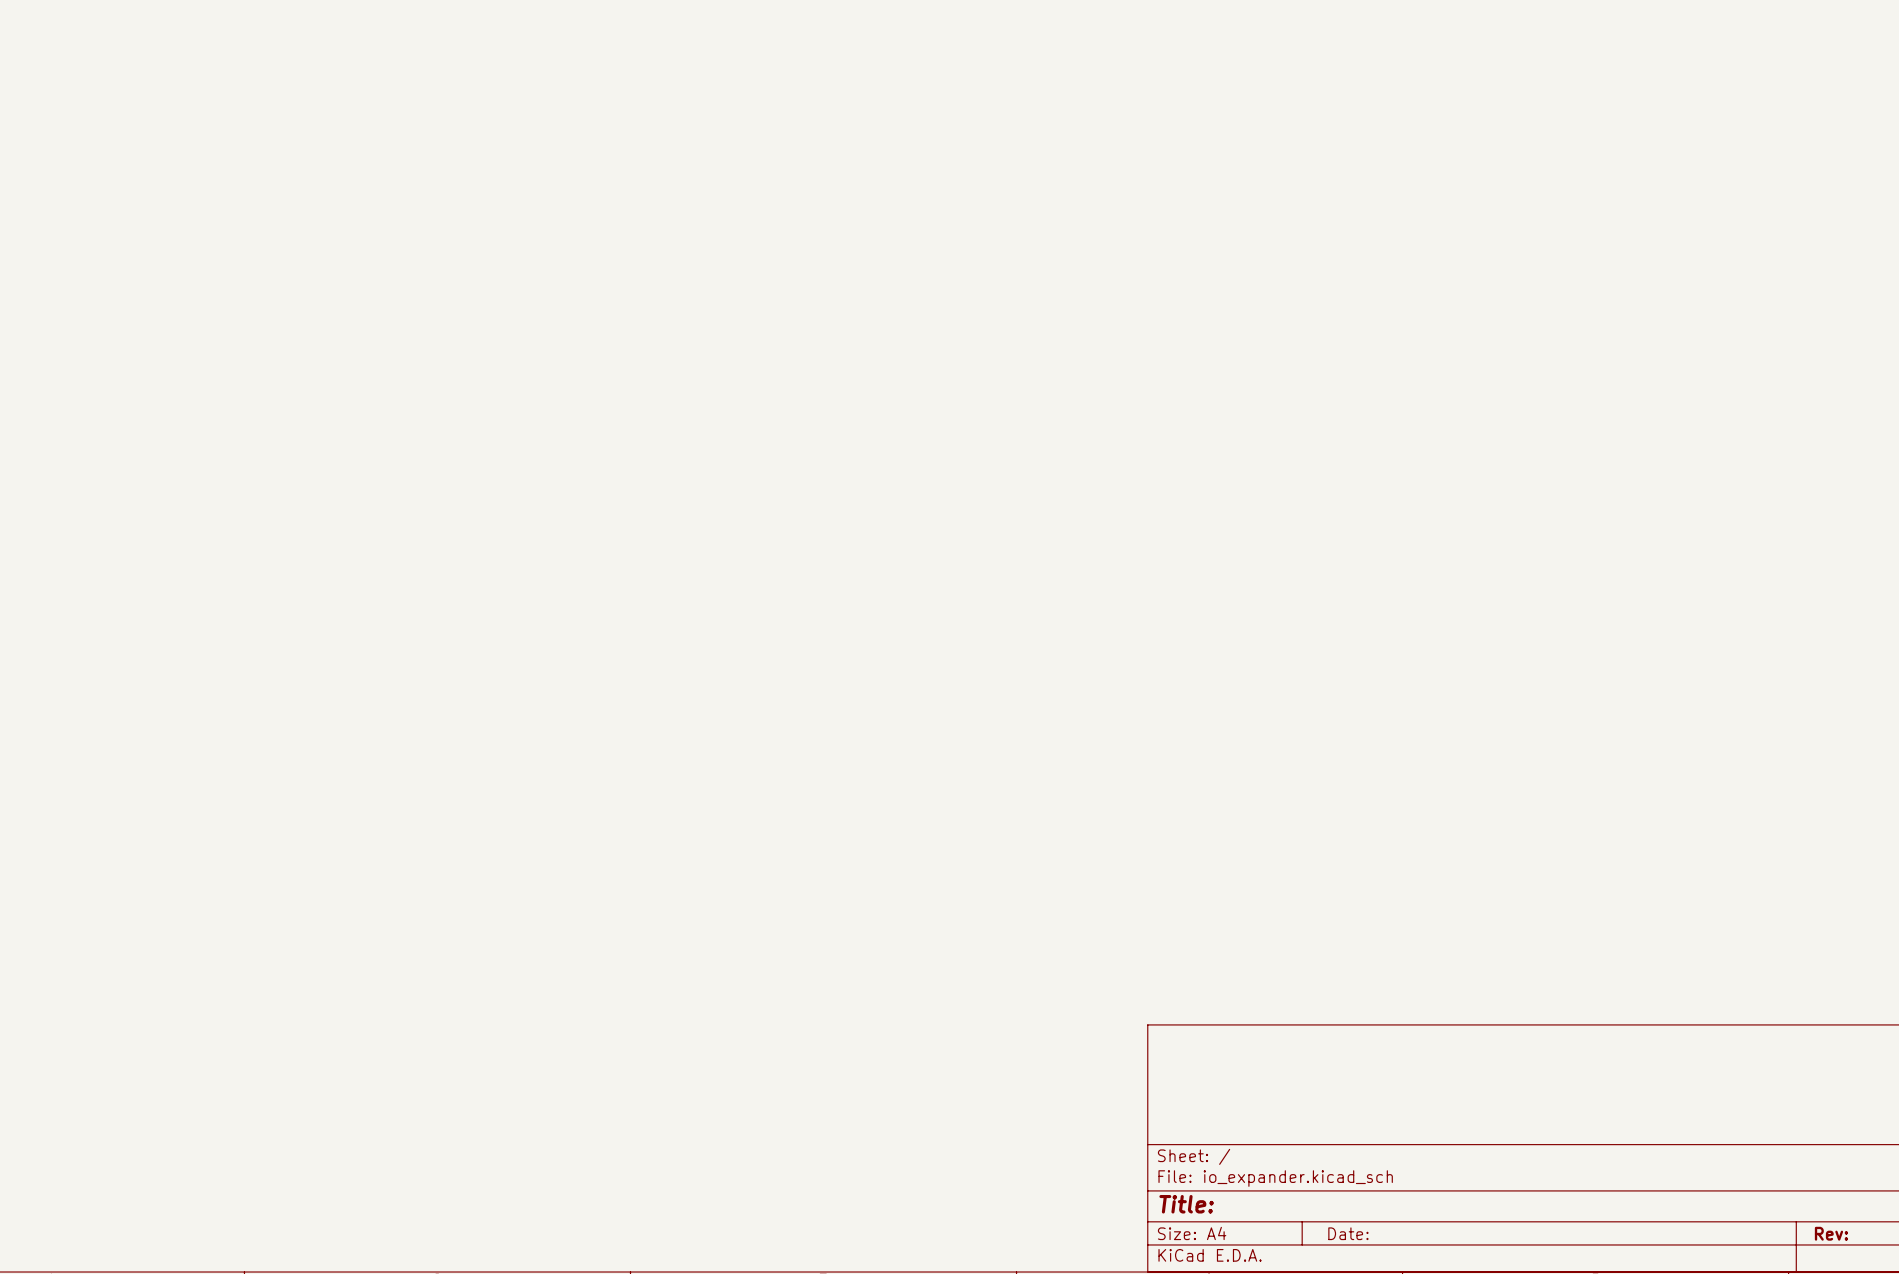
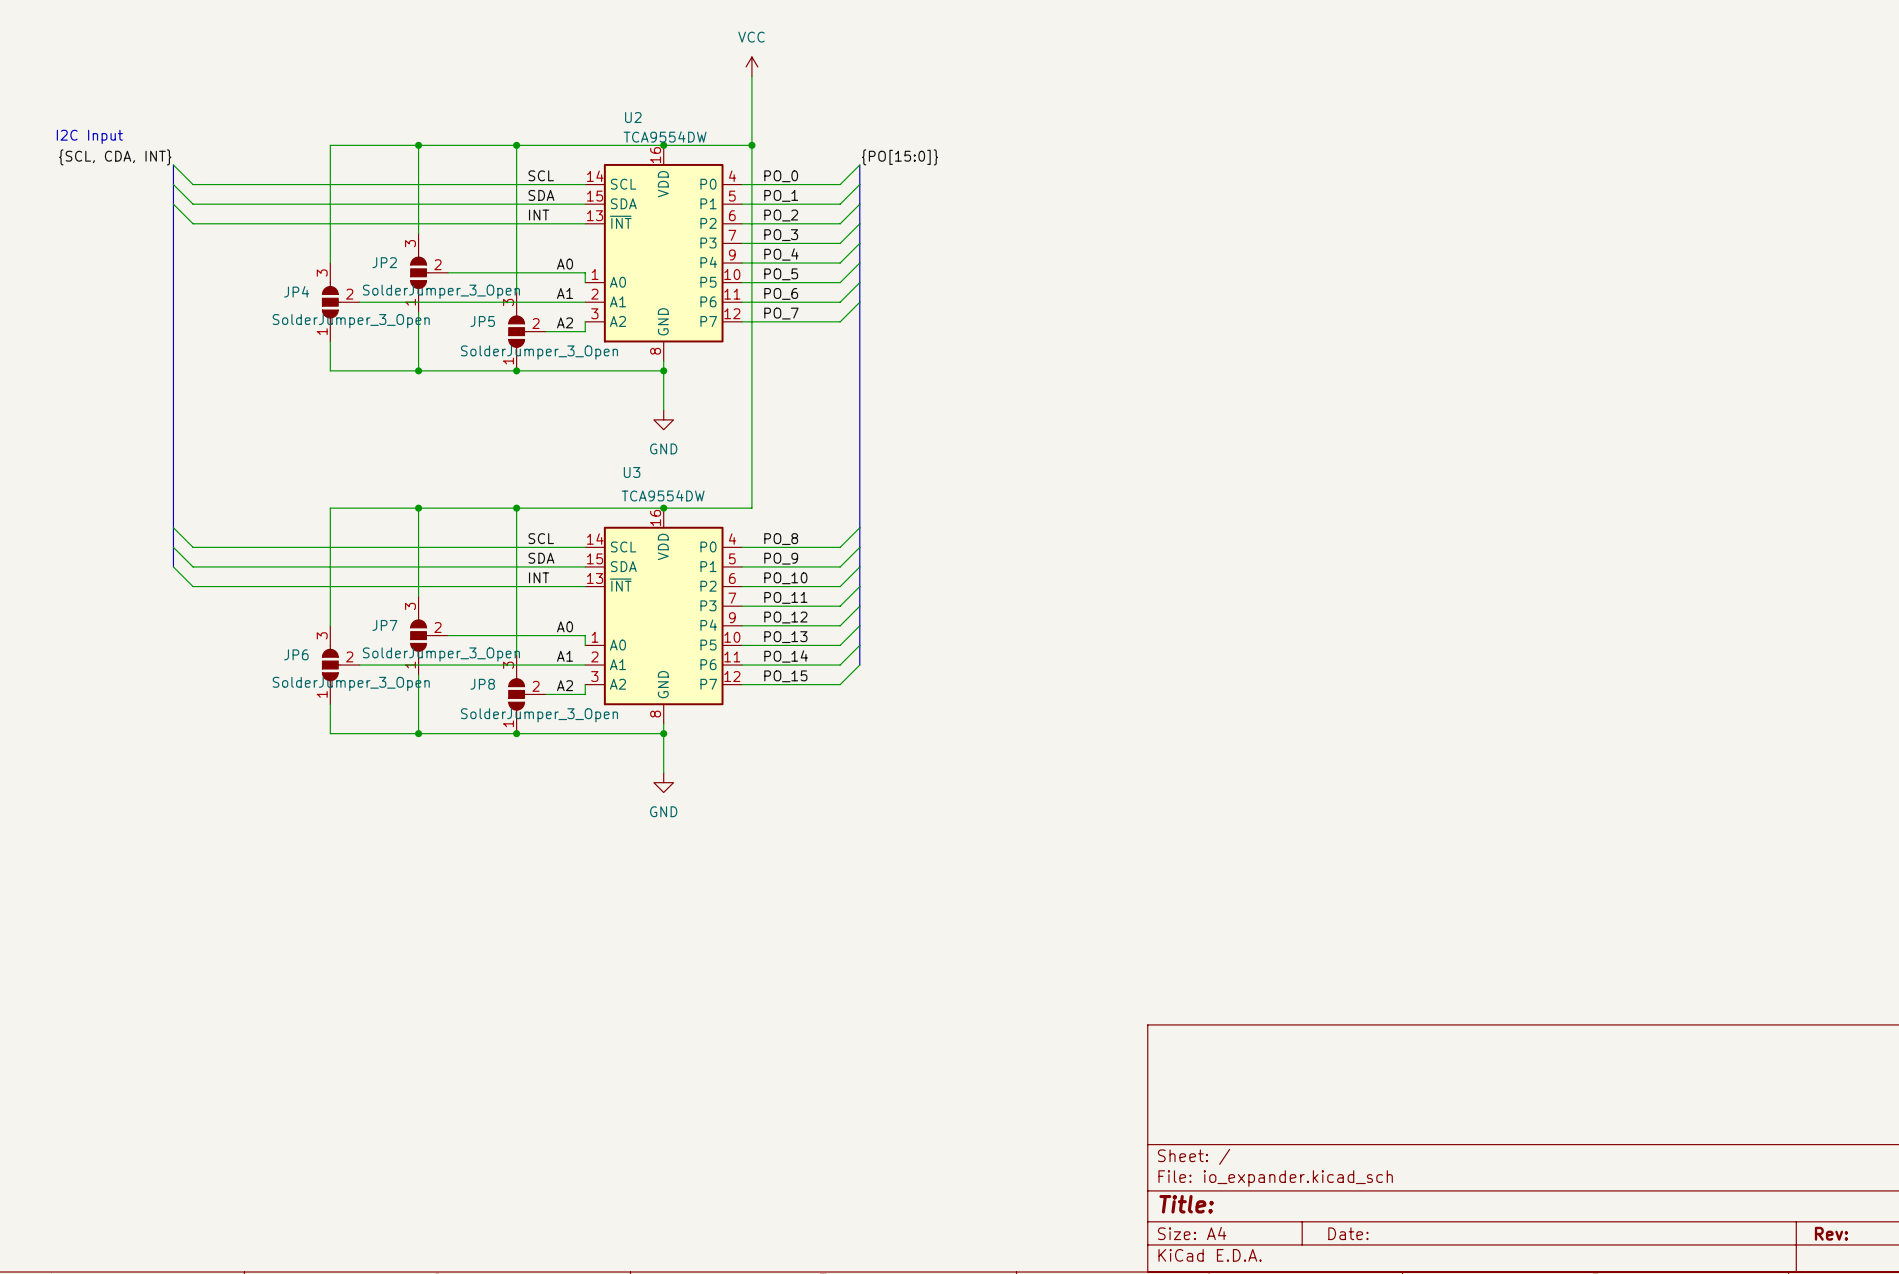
power symbol: none -> VCC (751, 66)
wire: none -> (751, 76) (751, 508) (330, 508) (330, 625)
text: none -> I2C Input (89, 136)
wire: none -> (418, 145) (418, 233)
junction: none -> (418, 145)
wire: none -> (516, 145) (516, 292)
junction: none -> (516, 145)
junction: none -> (663, 145)
wire: none -> (751, 145) (330, 145) (330, 263)
junction: none -> (751, 145)
label: none -> {SCL, CDA, INT} (115, 157)
label: none -> {PO[15:0]} (900, 157)
wire: none -> (173, 164) (193, 184) (585, 184)
bus: none -> (173, 164) (173, 566)
wire: none -> (859, 164) (840, 184) (742, 184)
bus: none -> (859, 164) (859, 665)
label: none -> SCL (541, 175)
label: none -> PO_0 (781, 176)
wire: none -> (173, 184) (193, 204) (585, 204)
wire: none -> (859, 184) (840, 204) (742, 204)
label: none -> SDA (541, 195)
label: none -> PO_1 (781, 195)
wire: none -> (173, 204) (193, 223) (585, 223)
wire: none -> (859, 204) (840, 223) (742, 223)
label: none -> INT (539, 215)
label: none -> PO_2 (781, 215)
wire: none -> (859, 223) (840, 243) (742, 243)
label: none -> PO_3 (781, 235)
wire: none -> (859, 243) (840, 263) (742, 263)
U2: none -> TCA9554DW (663, 253)
label: none -> PO_4 (781, 254)
wire: none -> (859, 263) (840, 282) (742, 282)
label: none -> A0 (565, 264)
JP2: none -> SolderJumper_3_Open (429, 272)
wire: none -> (447, 272) (585, 272) (585, 282)
label: none -> PO_5 (781, 274)
wire: none -> (859, 282) (840, 302) (742, 302)
label: none -> A1 (565, 293)
label: none -> PO_6 (781, 293)
JP4: none -> SolderJumper_3_Open (341, 302)
wire: none -> (359, 302) (585, 302)
wire: none -> (859, 302) (840, 321) (742, 321)
wire: none -> (418, 312) (418, 370)
label: none -> PO_7 (781, 313)
wire: none -> (585, 321) (585, 331) (546, 331)
label: none -> A2 (565, 322)
JP5: none -> SolderJumper_3_Open (527, 331)
wire: none -> (330, 341) (330, 370) (663, 370)
wire: none -> (663, 361) (663, 410)
junction: none -> (418, 370)
junction: none -> (516, 370)
junction: none -> (663, 370)
power symbol: none -> GND (663, 419)
wire: none -> (418, 508) (418, 596)
junction: none -> (418, 508)
wire: none -> (516, 508) (516, 655)
junction: none -> (516, 508)
junction: none -> (663, 508)
wire: none -> (173, 527) (193, 547) (585, 547)
wire: none -> (859, 527) (840, 547) (742, 547)
label: none -> SCL (541, 538)
label: none -> PO_8 (781, 539)
wire: none -> (173, 547) (193, 566) (585, 566)
wire: none -> (859, 547) (840, 566) (742, 566)
label: none -> SDA (541, 558)
label: none -> PO_9 (781, 558)
wire: none -> (173, 566) (193, 586) (585, 586)
wire: none -> (859, 566) (840, 586) (742, 586)
label: none -> INT (539, 577)
label: none -> PO_10 (785, 578)
wire: none -> (859, 586) (840, 606) (742, 606)
label: none -> PO_11 (785, 597)
wire: none -> (859, 606) (840, 625) (742, 625)
U3: none -> TCA9554DW (663, 615)
label: none -> PO_12 (785, 617)
wire: none -> (859, 625) (840, 645) (742, 645)
label: none -> A0 (565, 626)
JP7: none -> SolderJumper_3_Open (429, 635)
wire: none -> (447, 635) (585, 635) (585, 645)
label: none -> PO_13 (785, 637)
wire: none -> (859, 645) (840, 665) (742, 665)
label: none -> A1 (565, 656)
label: none -> PO_14 (786, 656)
JP6: none -> SolderJumper_3_Open (341, 665)
wire: none -> (359, 665) (585, 665)
wire: none -> (859, 665) (840, 684) (742, 684)
wire: none -> (418, 674) (418, 733)
label: none -> PO_15 (785, 676)
wire: none -> (585, 684) (585, 694) (546, 694)
label: none -> A2 (565, 685)
JP8: none -> SolderJumper_3_Open (527, 694)
wire: none -> (330, 704) (330, 733) (663, 733)
wire: none -> (663, 723) (663, 772)
junction: none -> (418, 733)
junction: none -> (516, 733)
junction: none -> (663, 733)
power symbol: none -> GND (663, 782)

